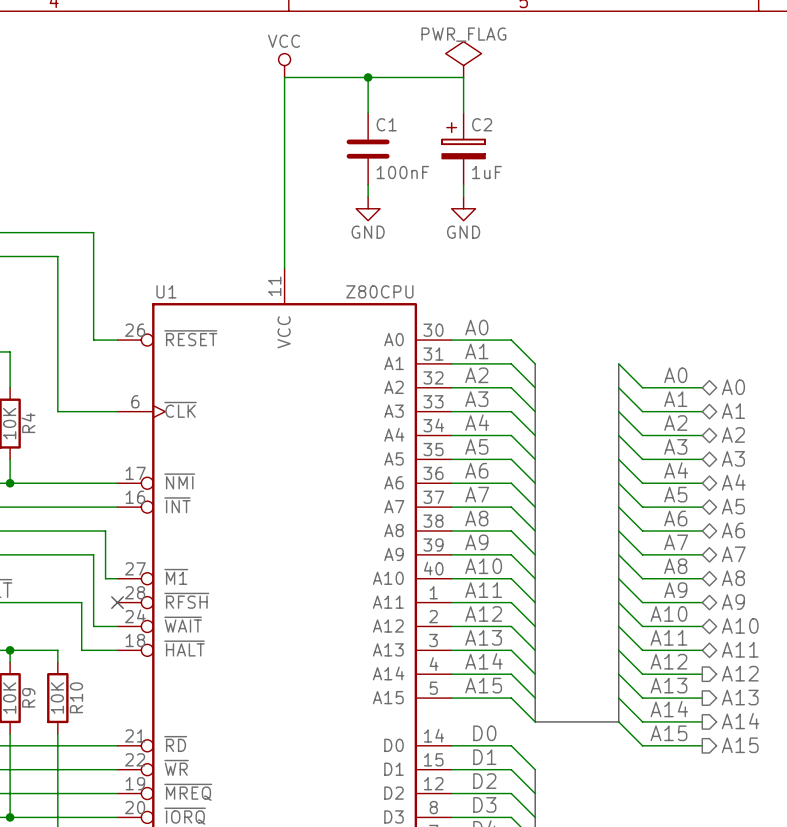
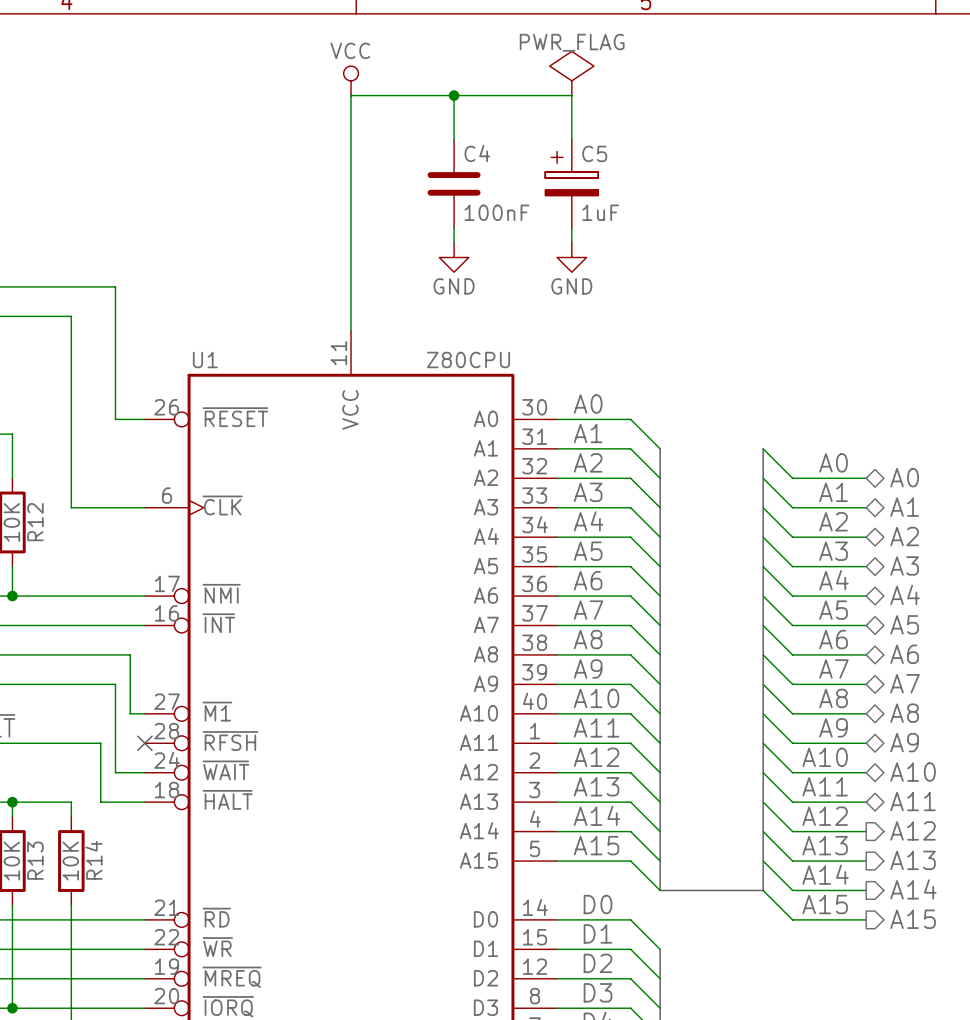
C1 name: C1 (386, 124) -> C4 (477, 153)
C2 name: C2 (482, 124) -> C5 (594, 153)
R4 name: R4 (28, 423) -> R12 (35, 522)
R9 name: R9 (28, 697) -> R13 (35, 860)
R10 name: R10 (76, 697) -> R14 (93, 860)

